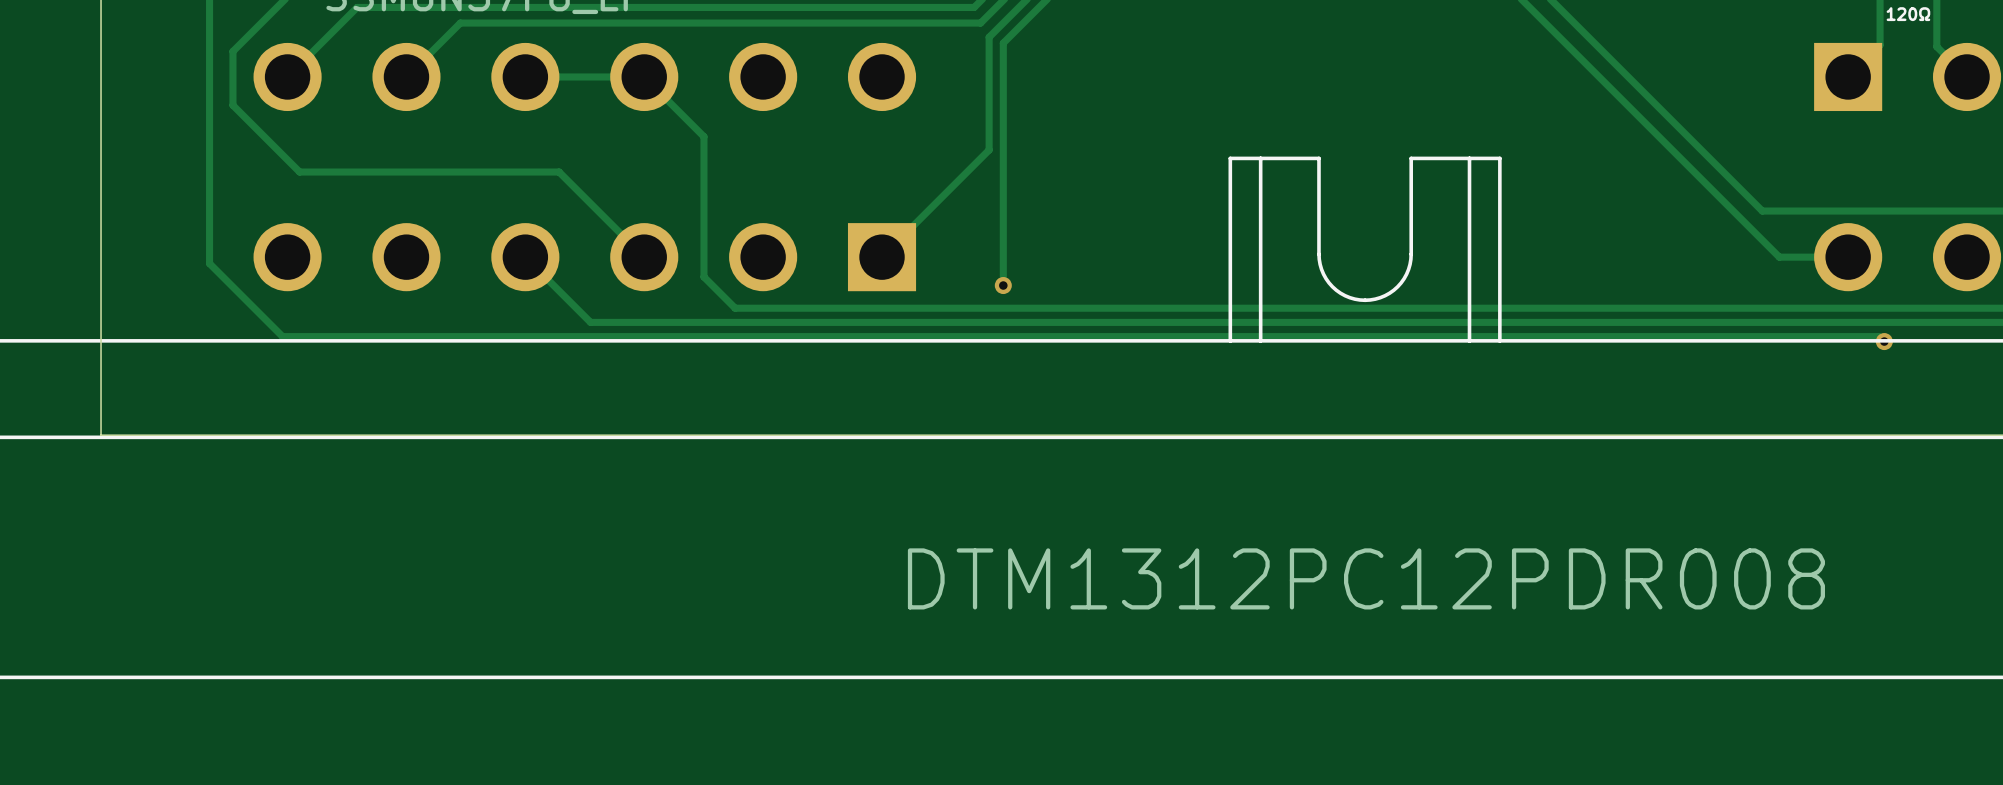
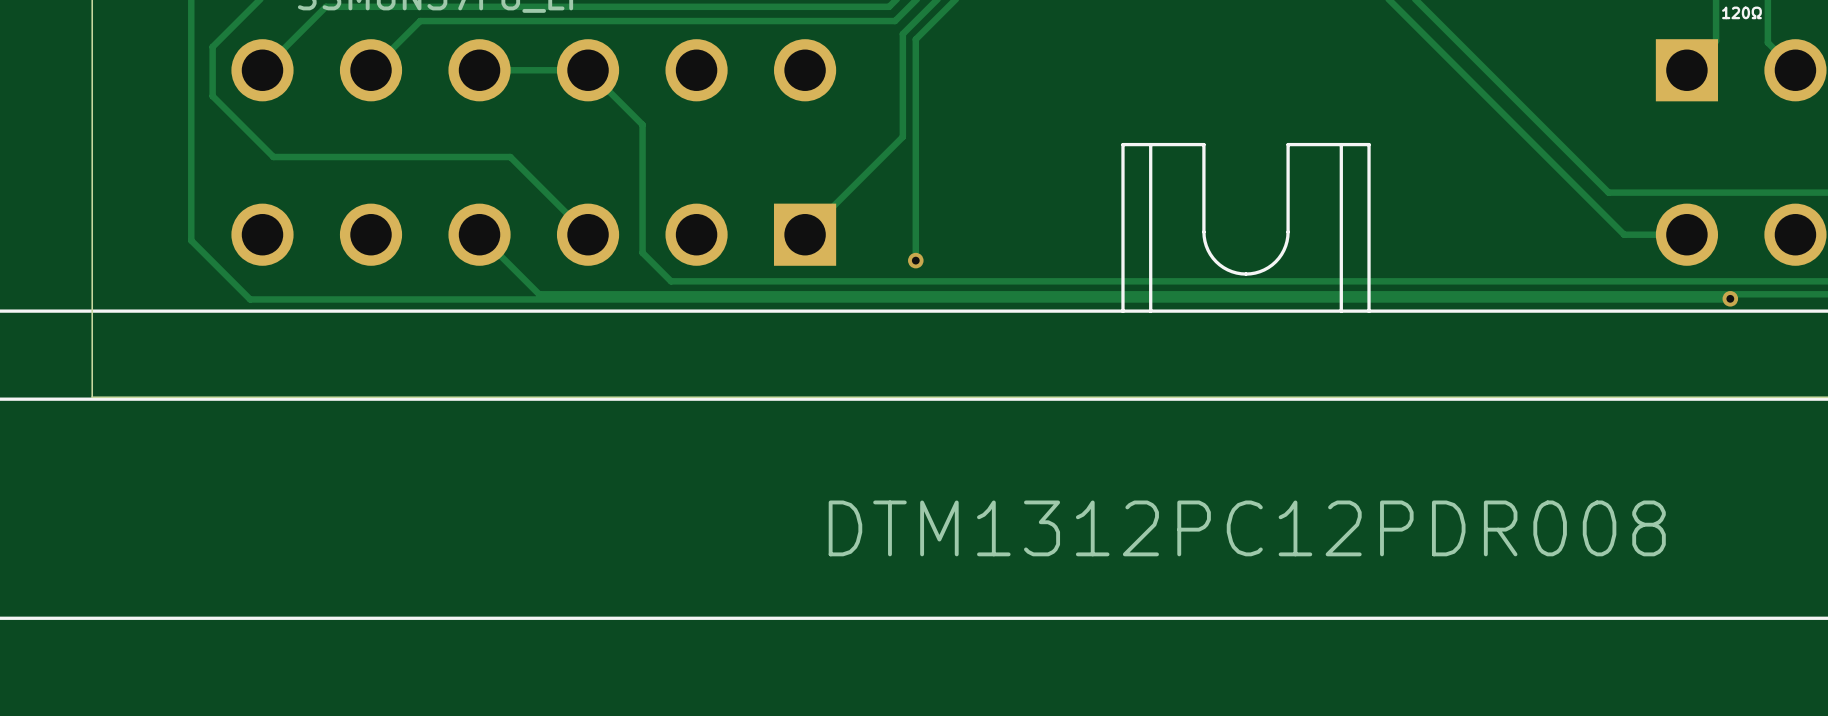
track: (274, 328) (282, 336) (1879, 336) (1884, 341) -> (250, 299) (1730, 298)
via position: (1884, 341) -> (1730, 298)

